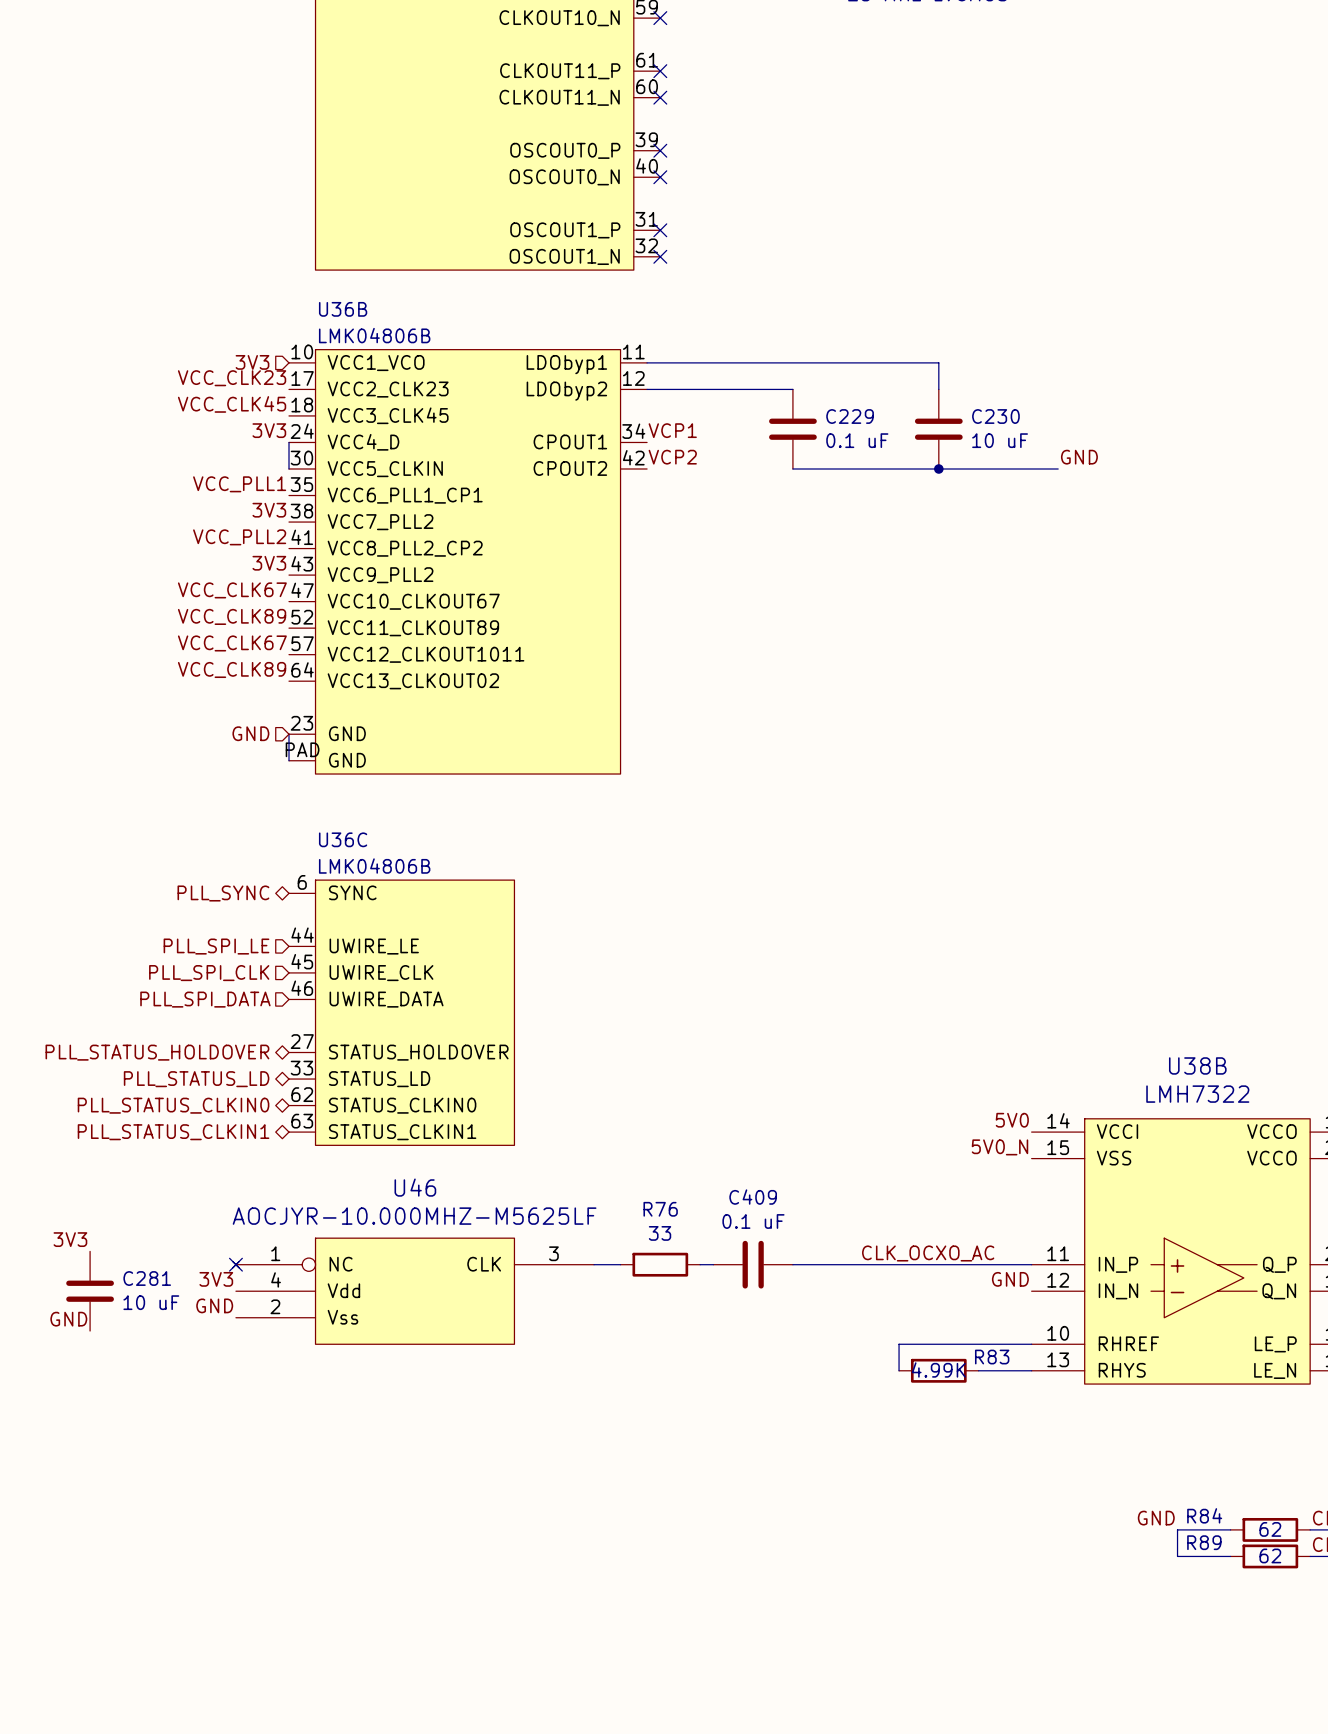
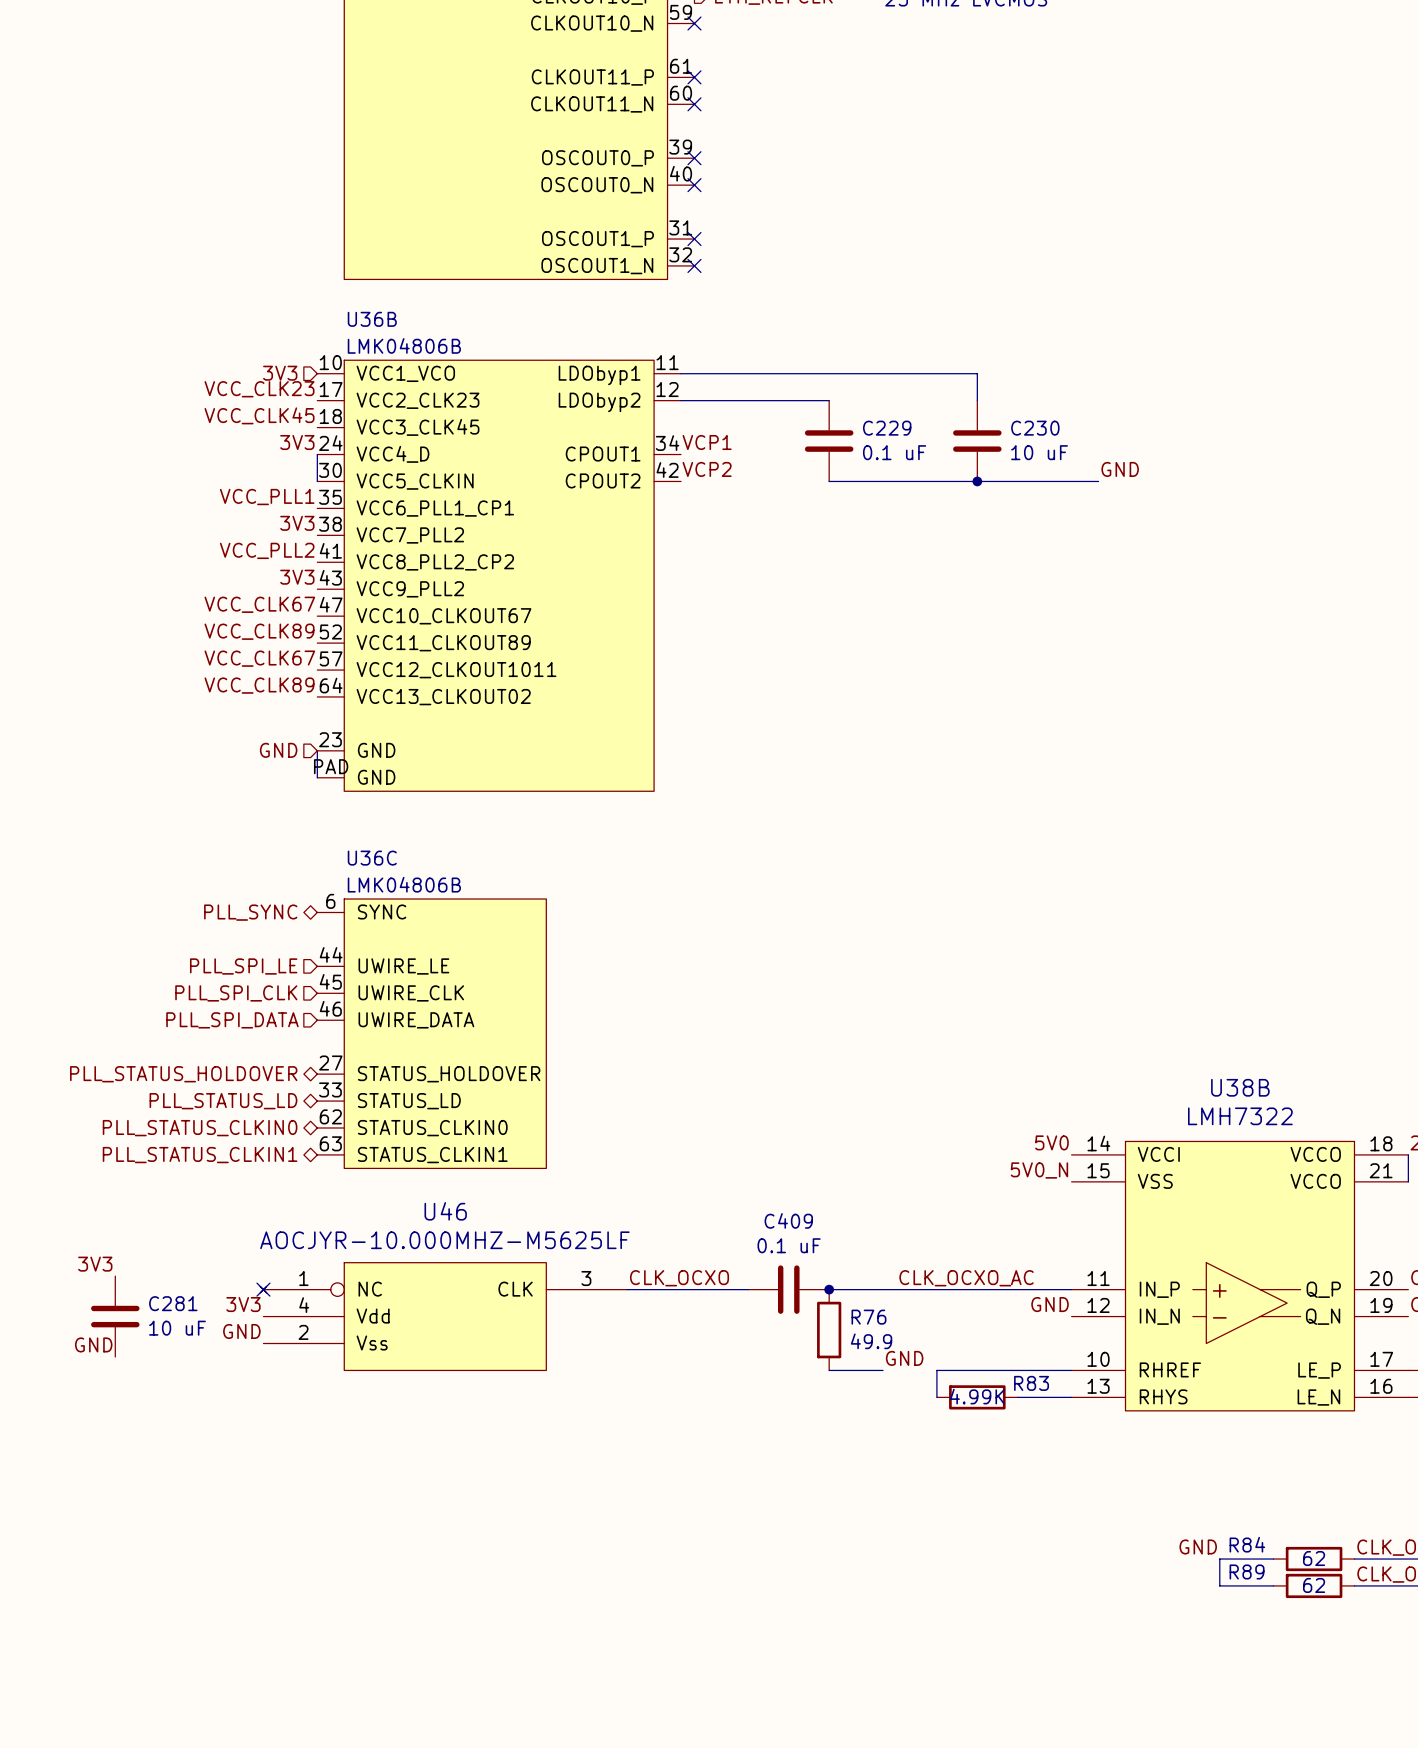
R76 value: 33 (660, 1233) -> 49.9 (871, 1341)
label: none -> CLK_OCXO (679, 1278)
wire: none -> (654, 1289) (734, 1289)
R76 rotation: 0° (660, 1264) -> 90° clockwise (829, 1330)
R76 position: (660, 1264) -> (829, 1330)
junction: none -> (829, 1289)
label: none -> GND (904, 1358)
wire: none -> (829, 1370) (883, 1370)

